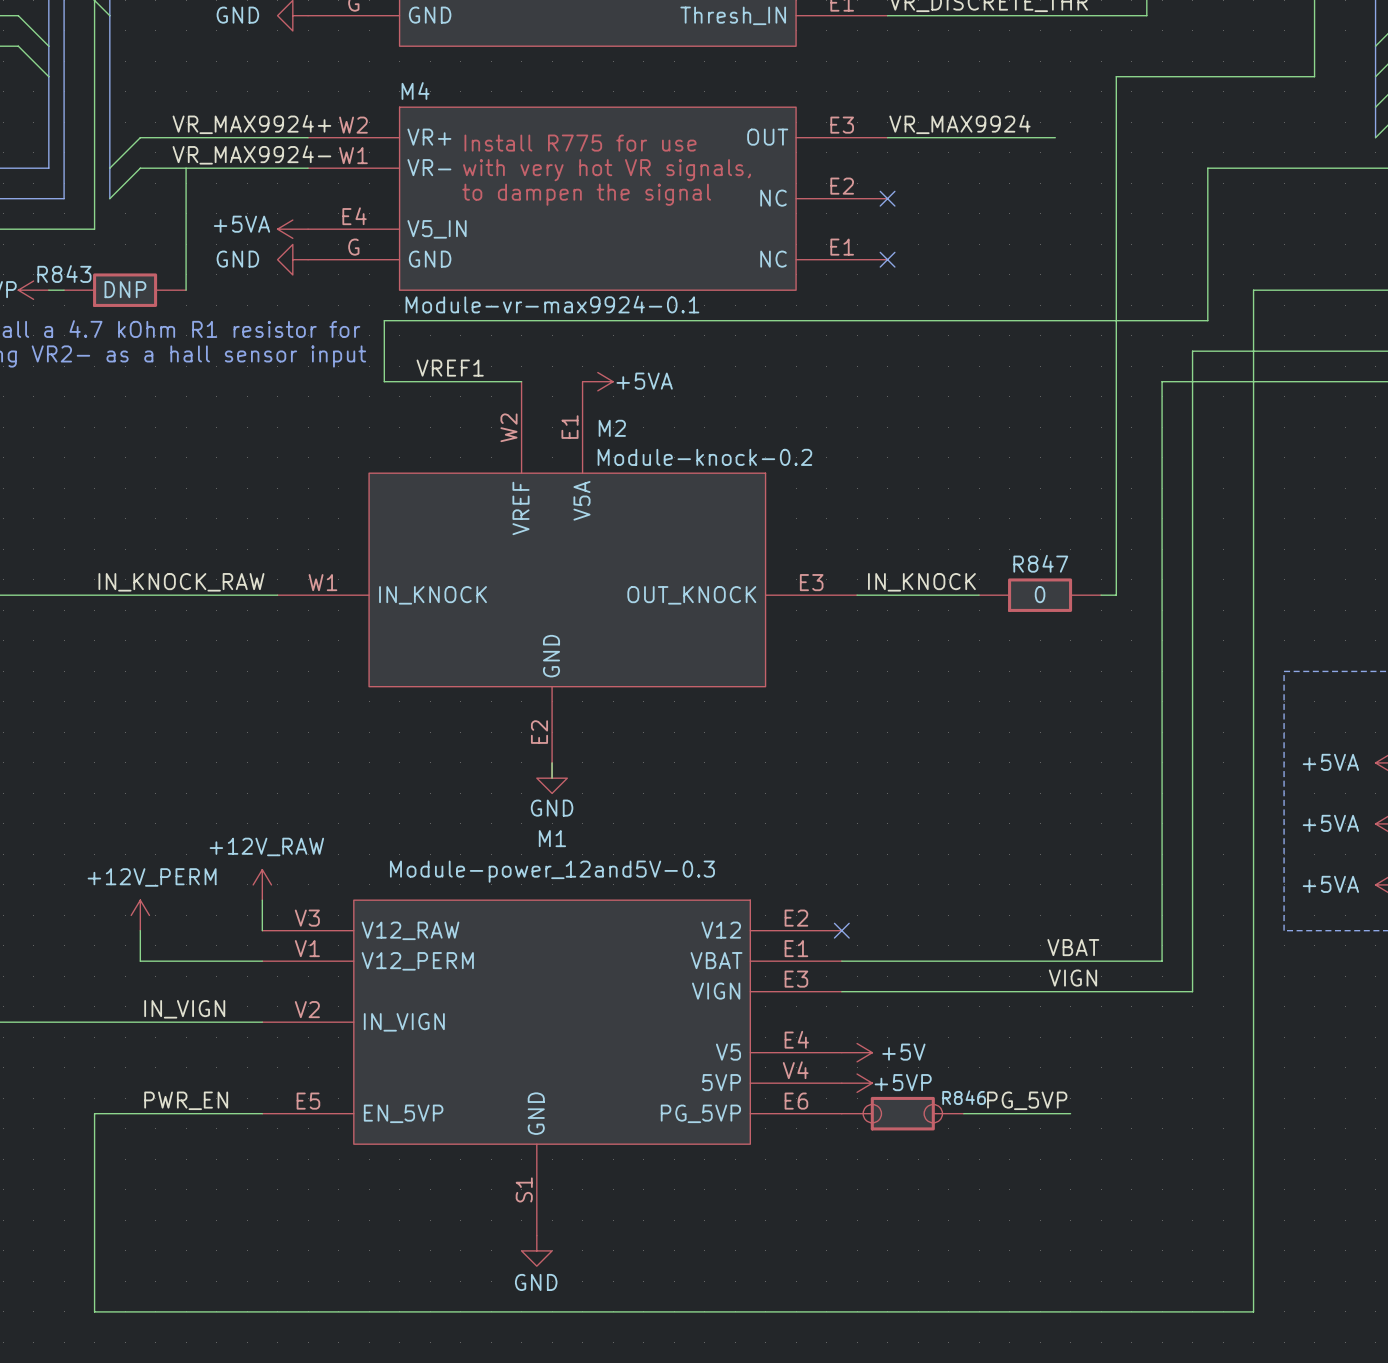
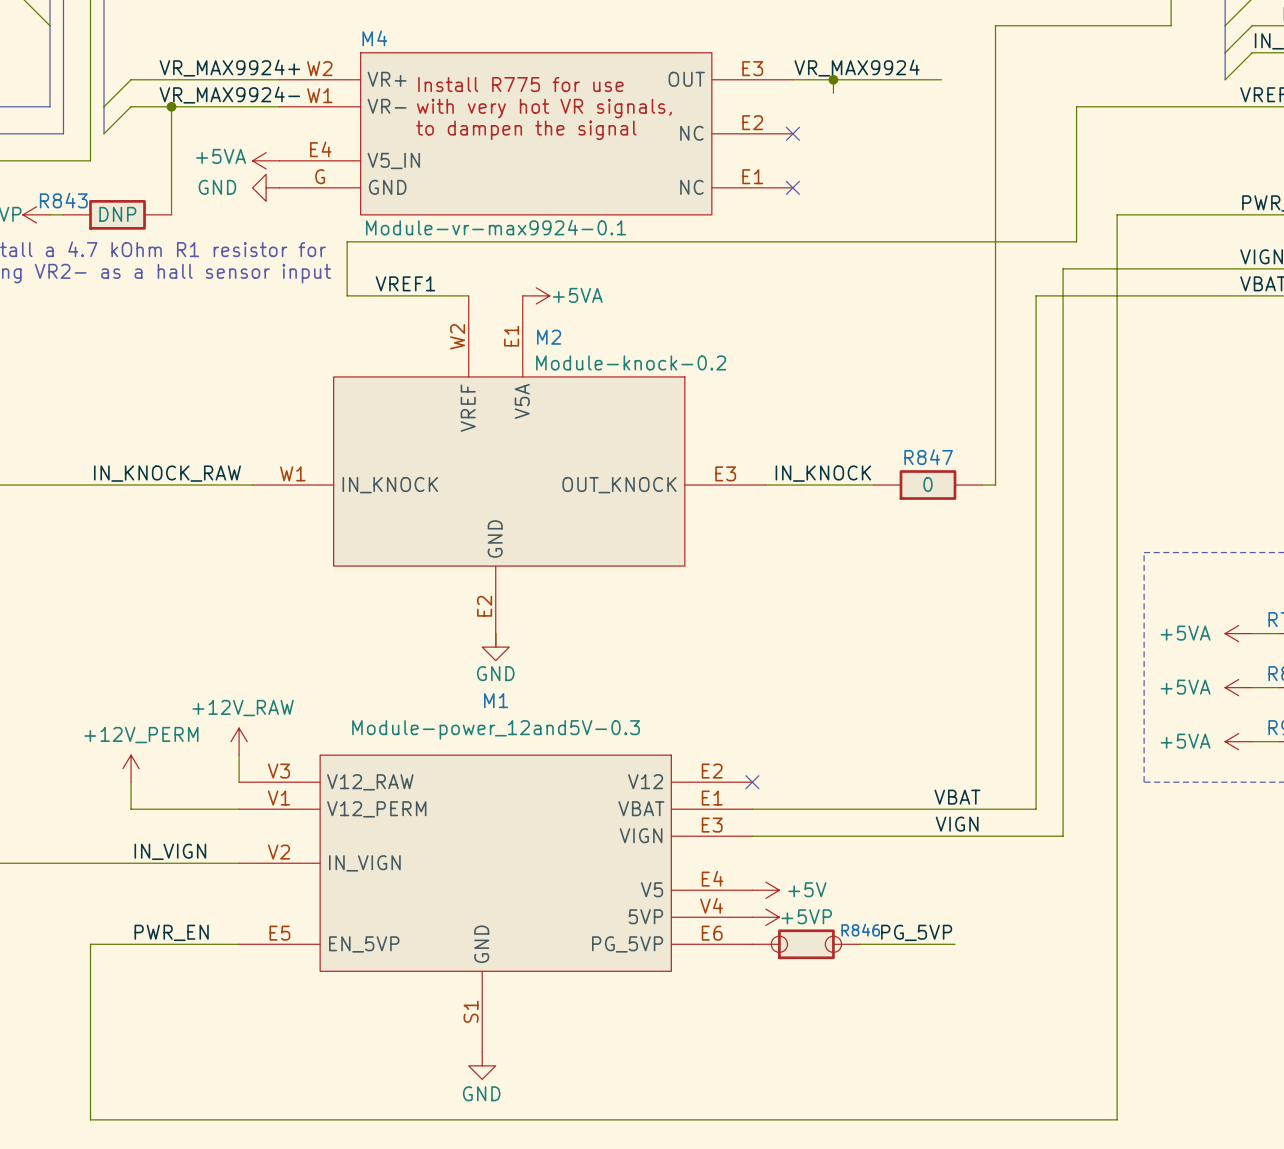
wire: none -> (833, 79) (833, 93)
junction: none -> (833, 79)
junction: none -> (171, 106)

